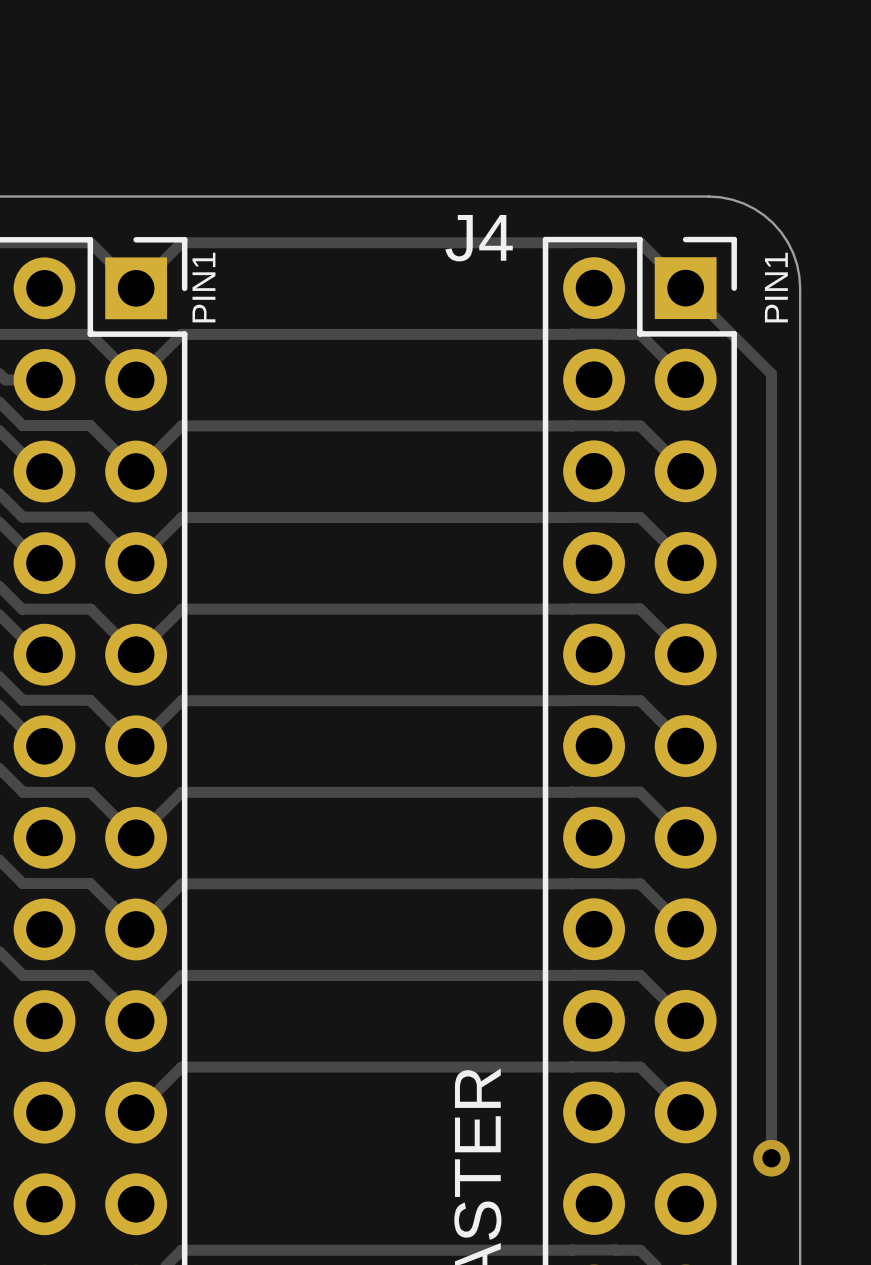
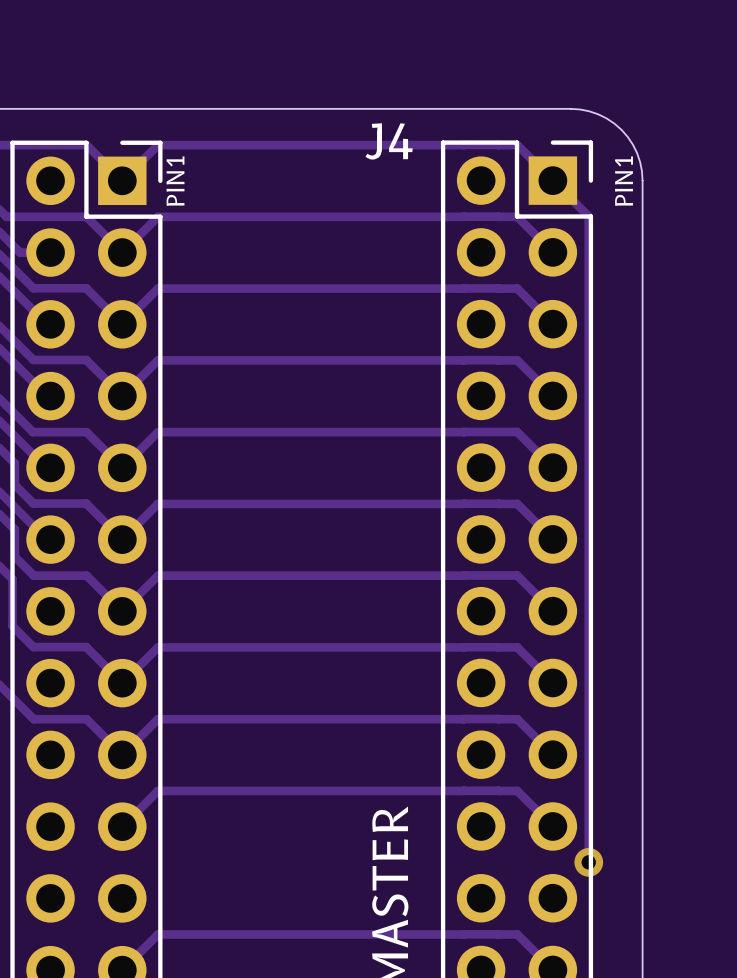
track: (731, 333) (771, 373) (771, 1158) -> (588, 216) (588, 862)
via position: (771, 1158) -> (588, 862)

